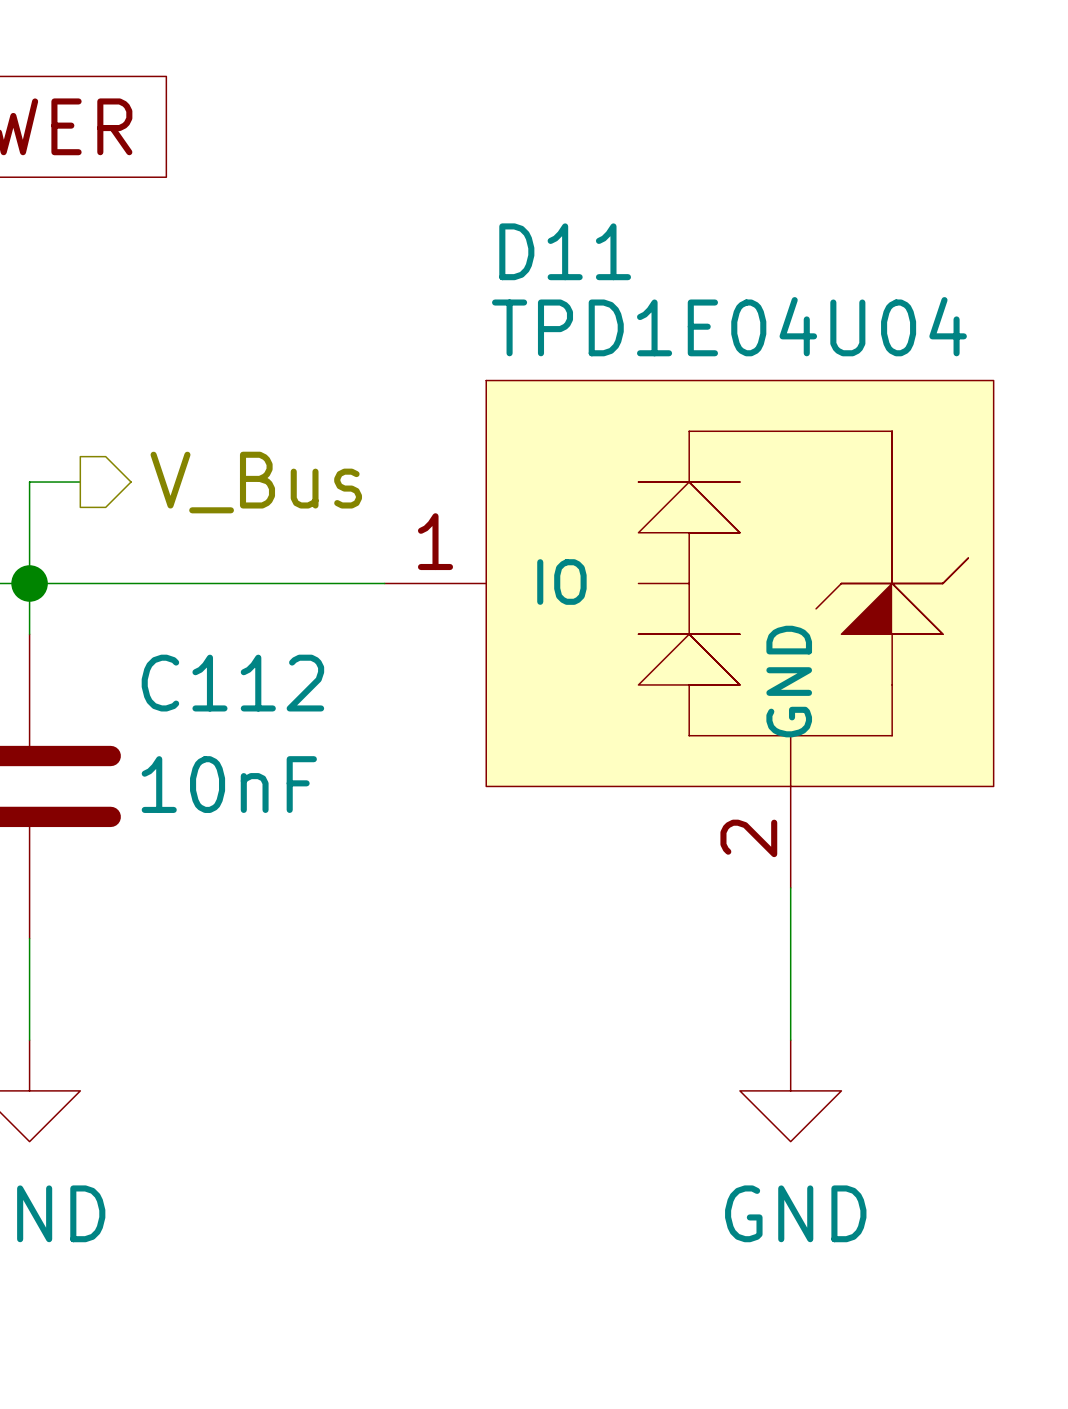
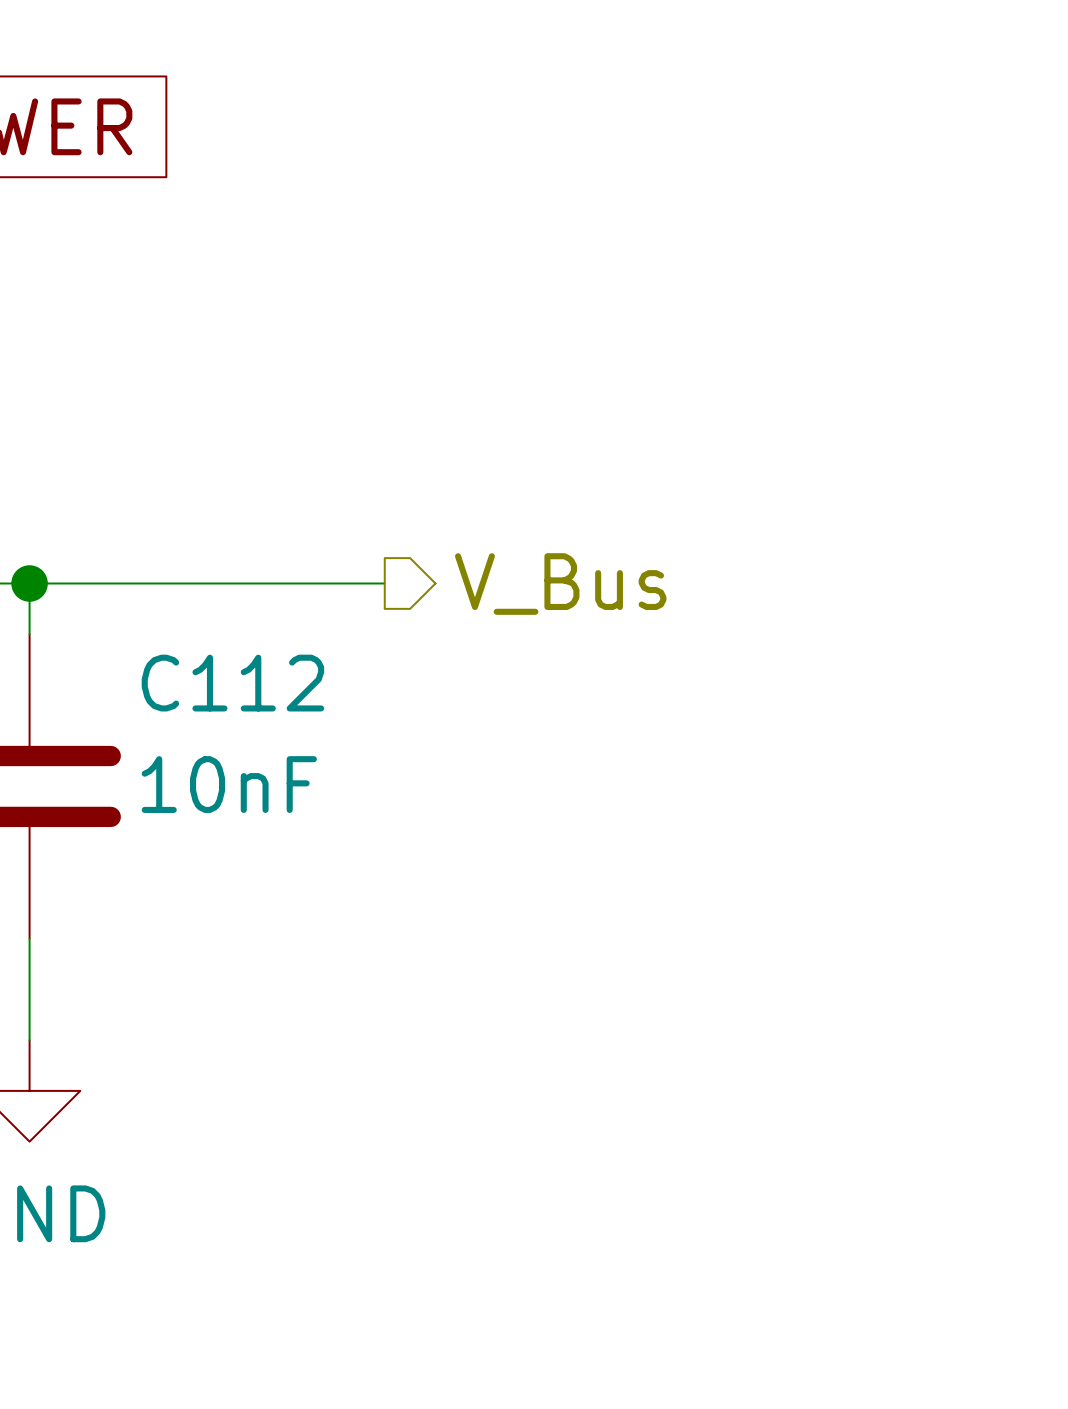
wire: (80, 482) (29, 482) (29, 583) -> none
hierarchical label position: V_Bus (256, 482) -> V_Bus (560, 584)
D11: TPD1E04U04 (689, 634) -> none
wire: (790, 887) (790, 1040) -> none
power symbol: GND (790, 1090) -> none

